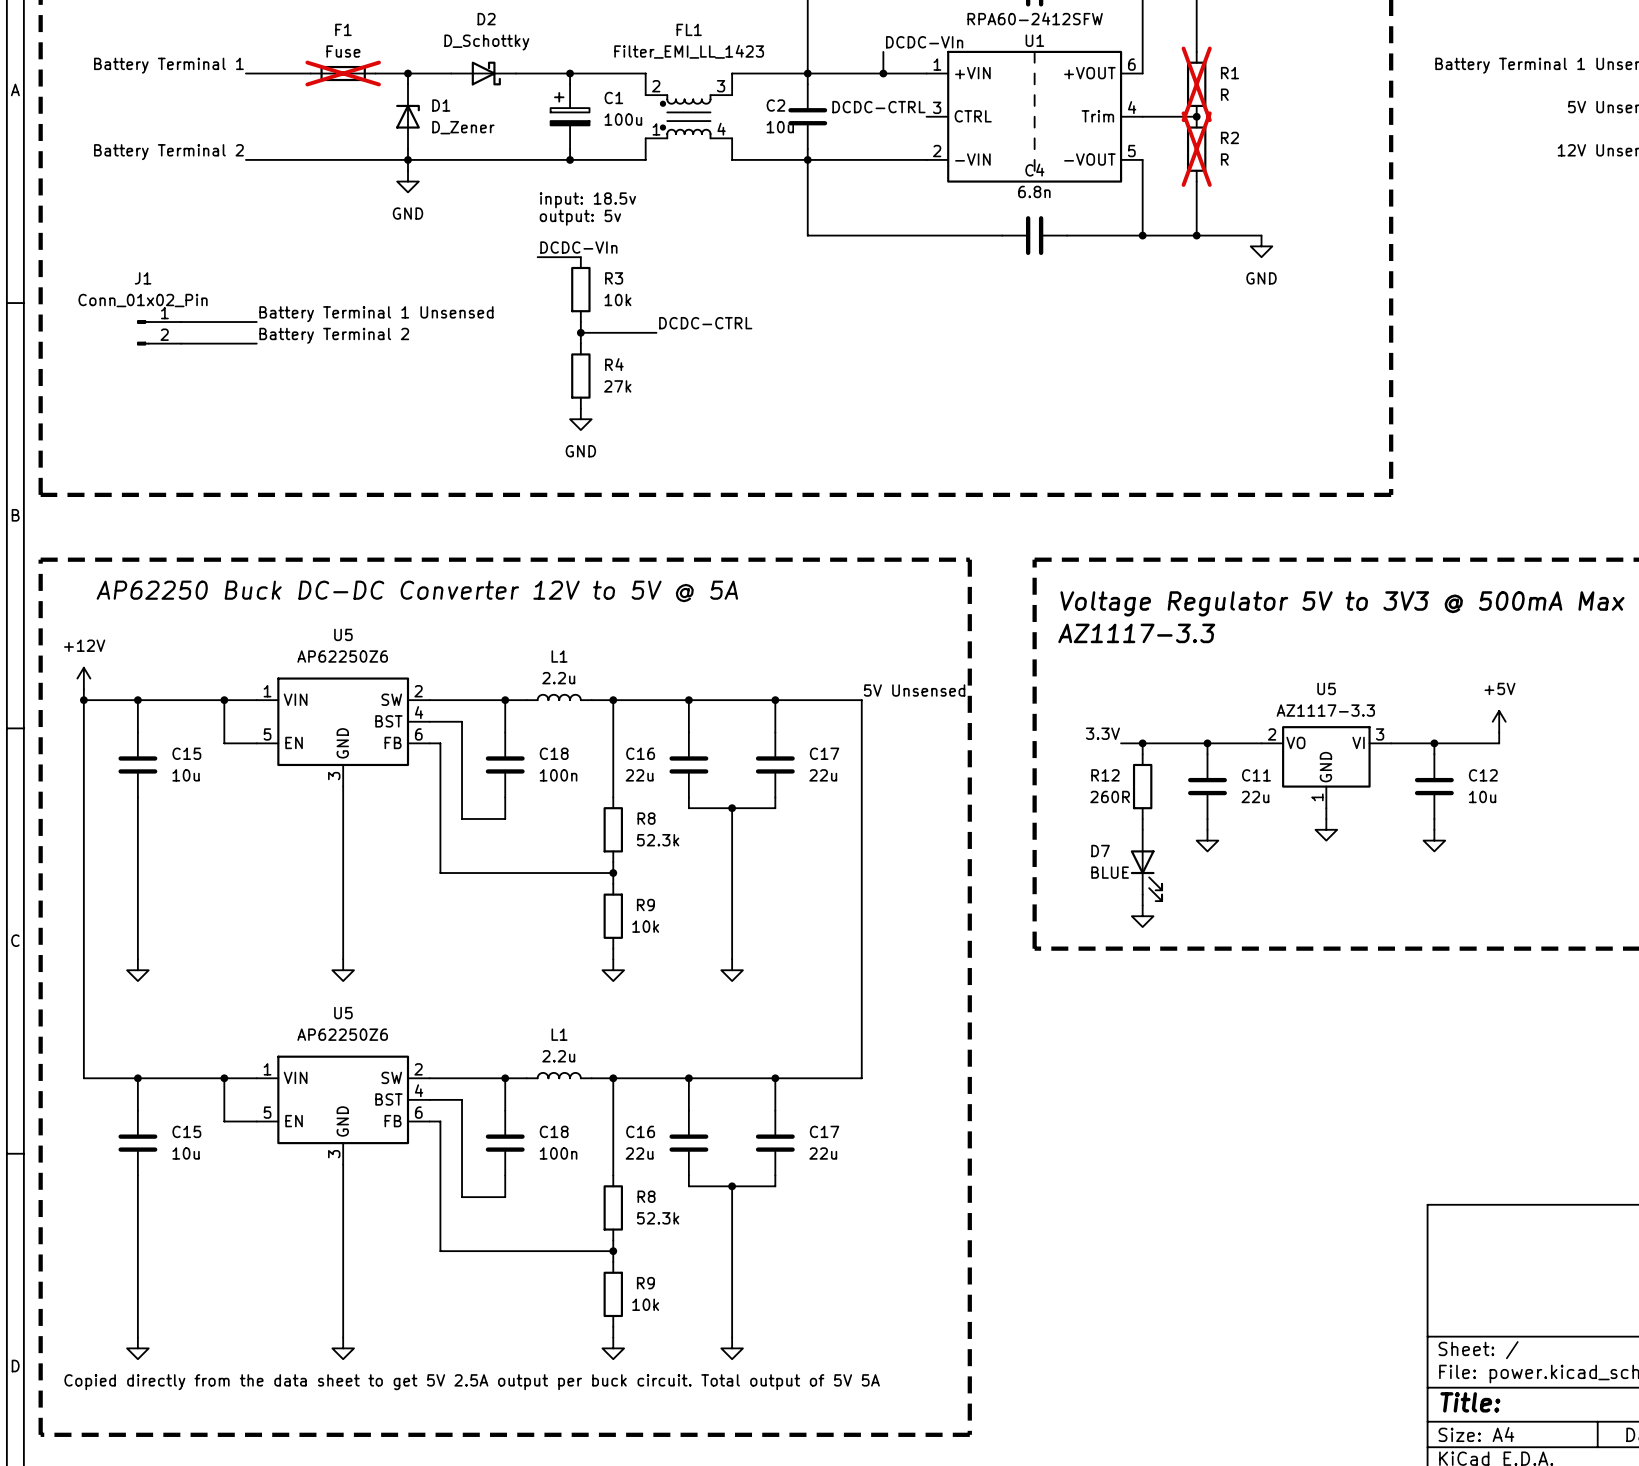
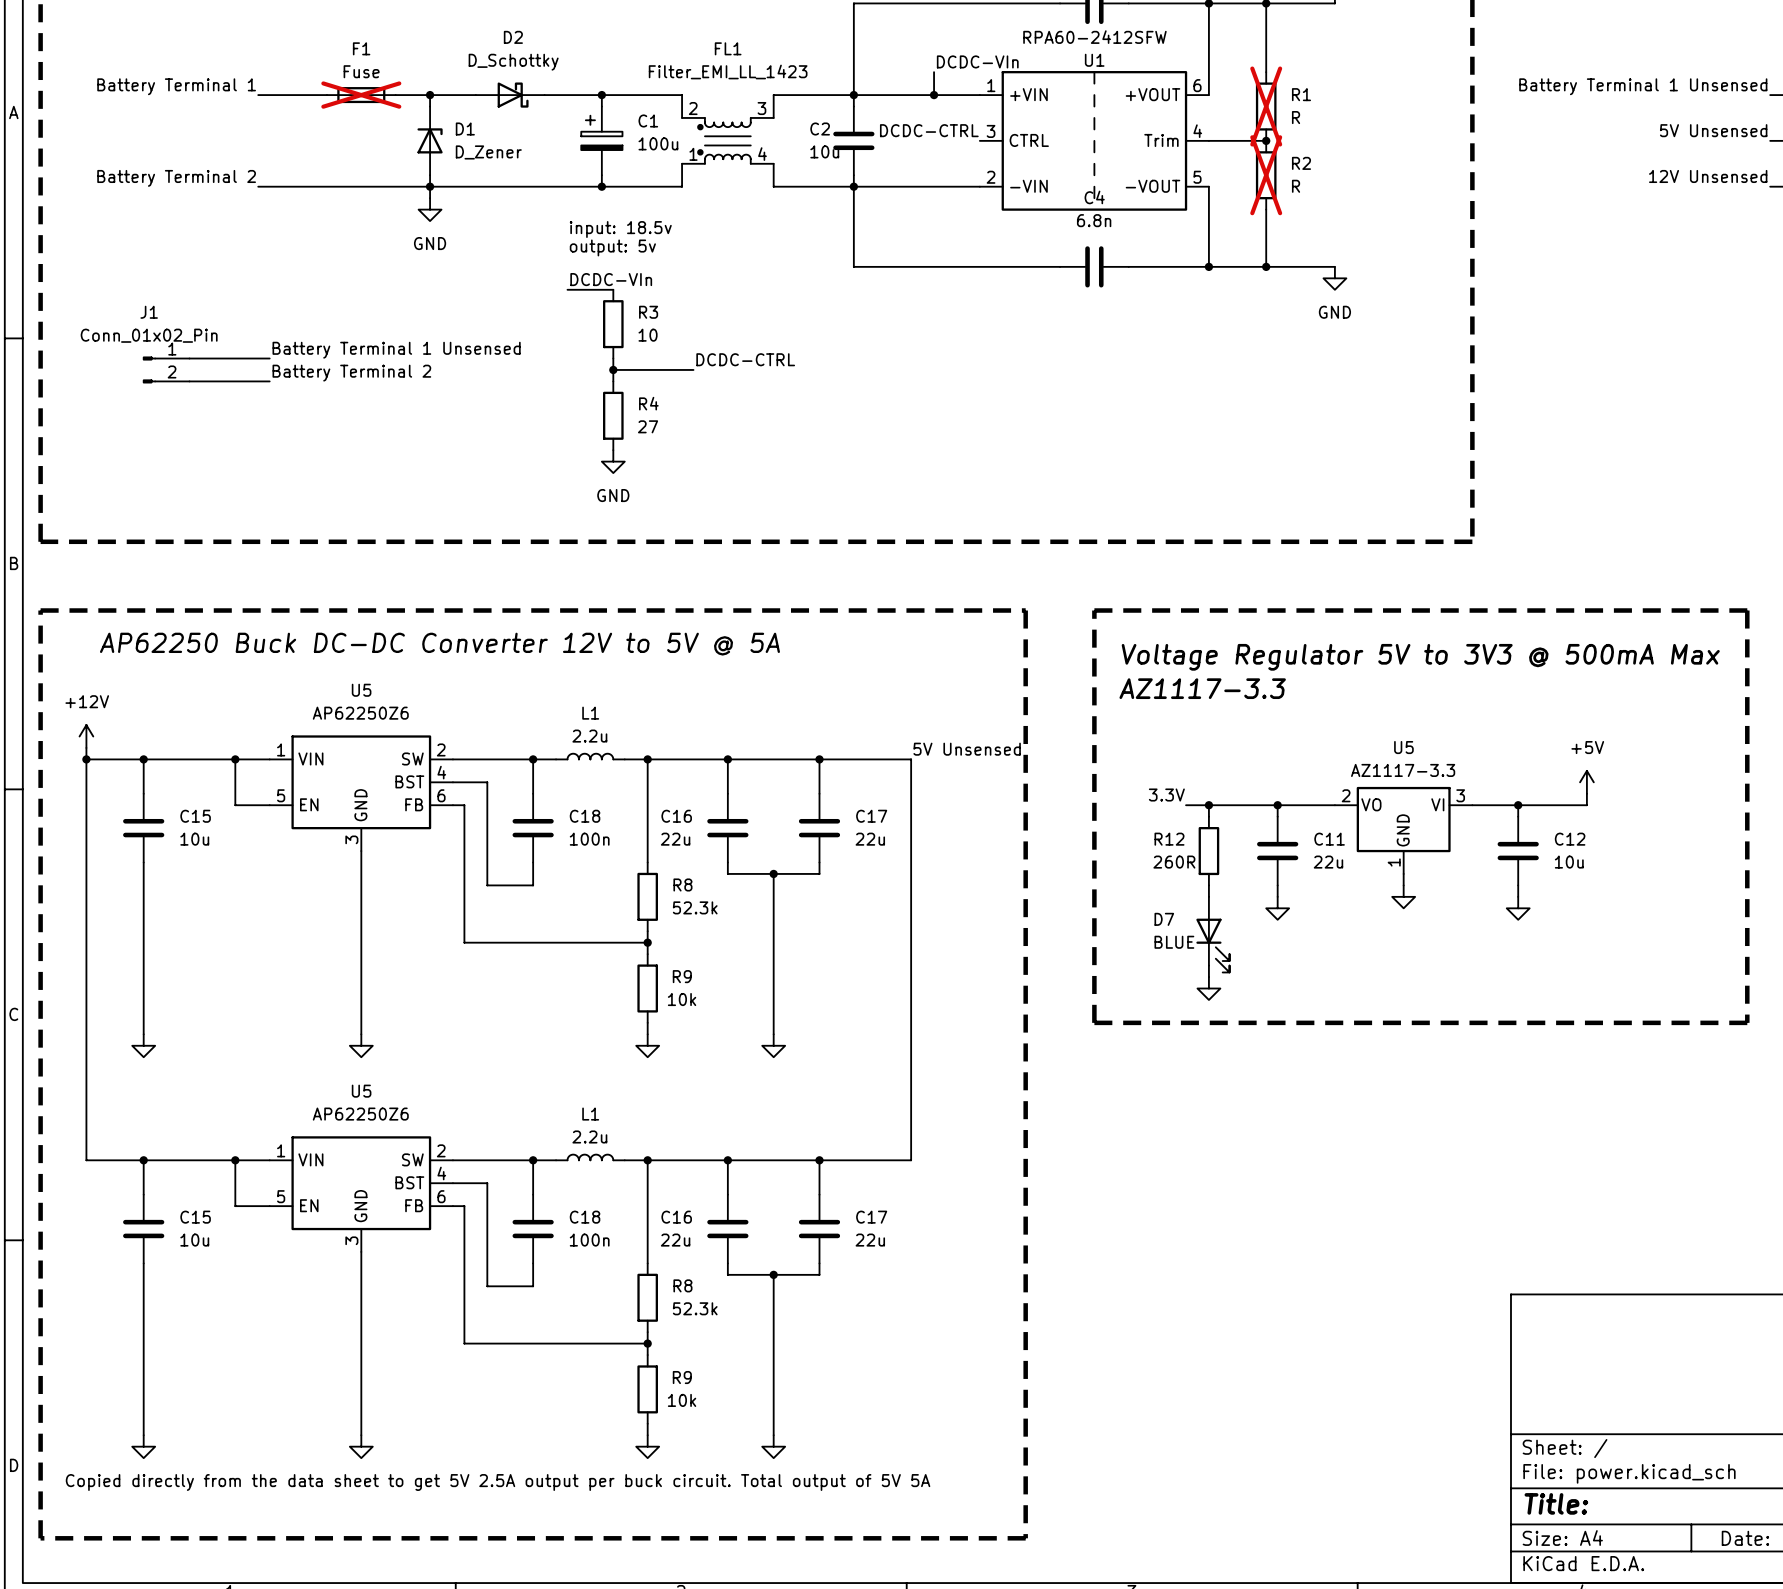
R3 value: 10k (617, 300) -> 10 (648, 335)
R4 value: 27k (617, 386) -> 27 (648, 426)

